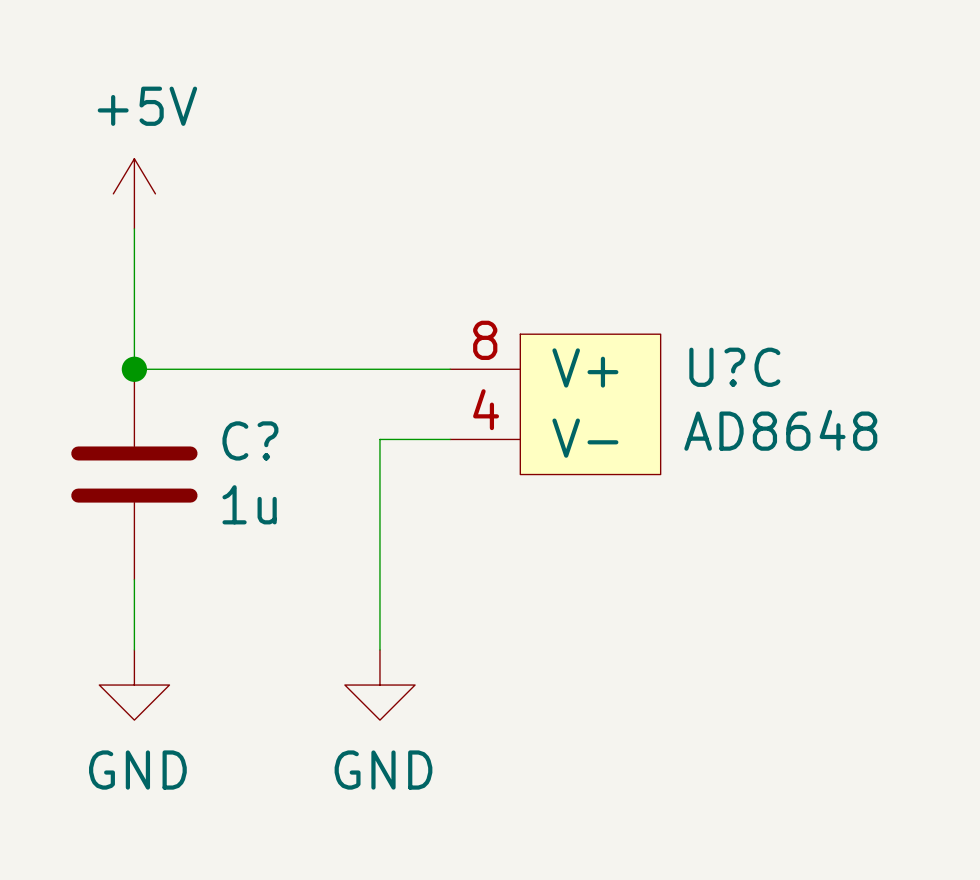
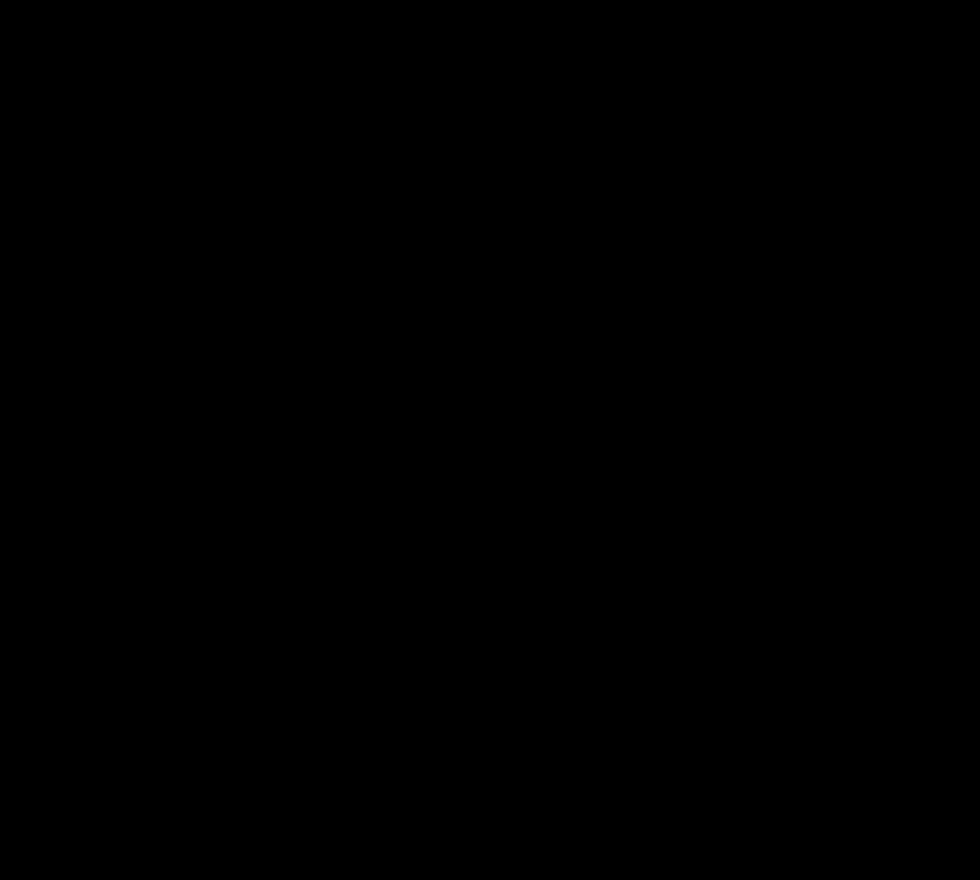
power symbol: +5V (134, 193) -> none
wire: (134, 228) (134, 369) (450, 369) -> none
junction: (134, 369) -> none
U?C: AD8648 (555, 404) -> none
wire: (450, 439) (379, 439) (379, 649) -> none
C?: 1u (134, 474) -> none
wire: (134, 579) (134, 649) -> none
power symbol: GND (134, 685) -> none
power symbol: GND (379, 685) -> none

